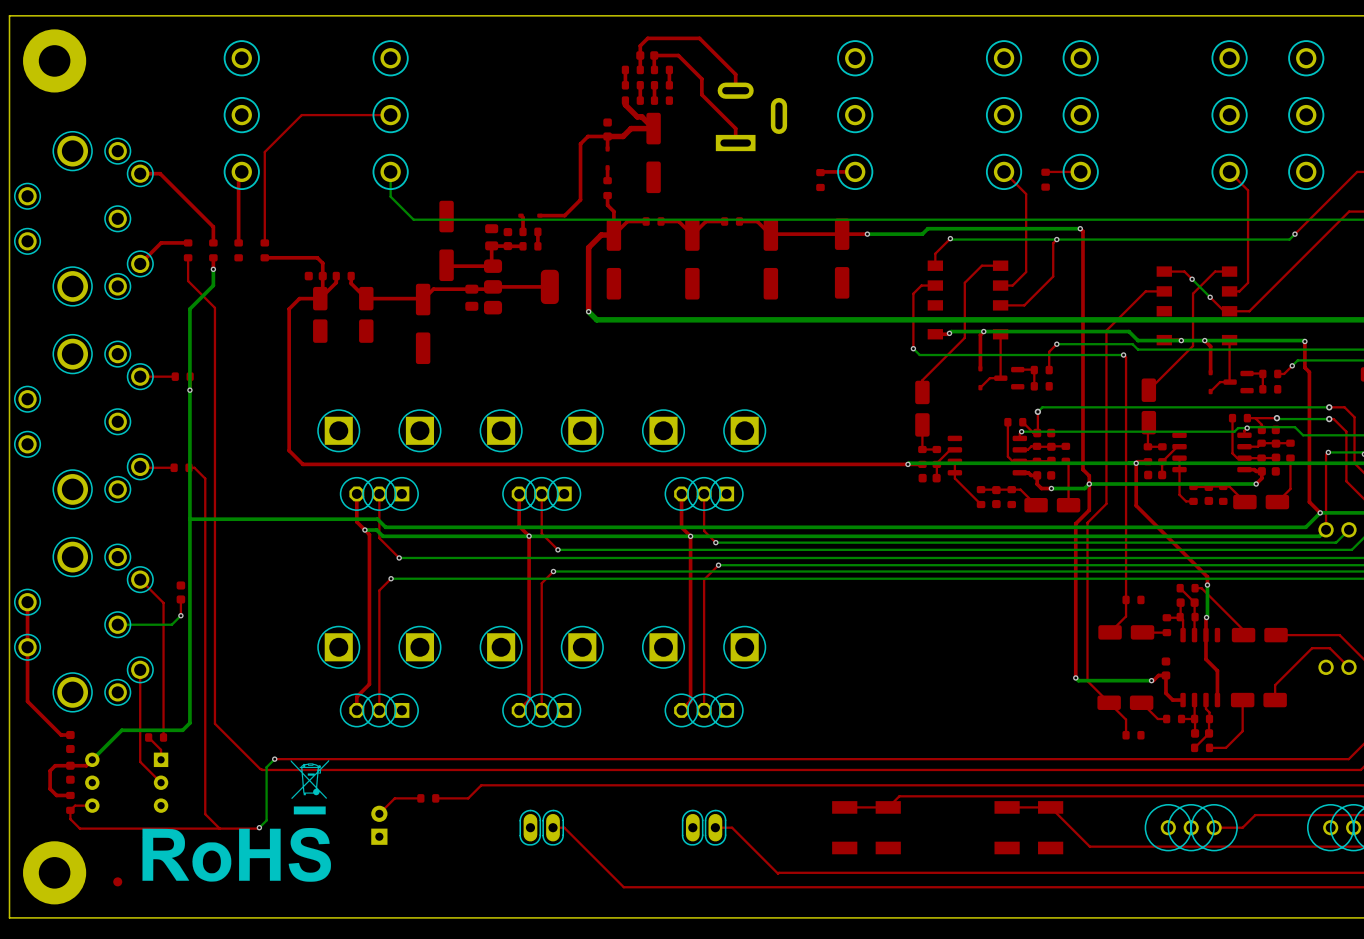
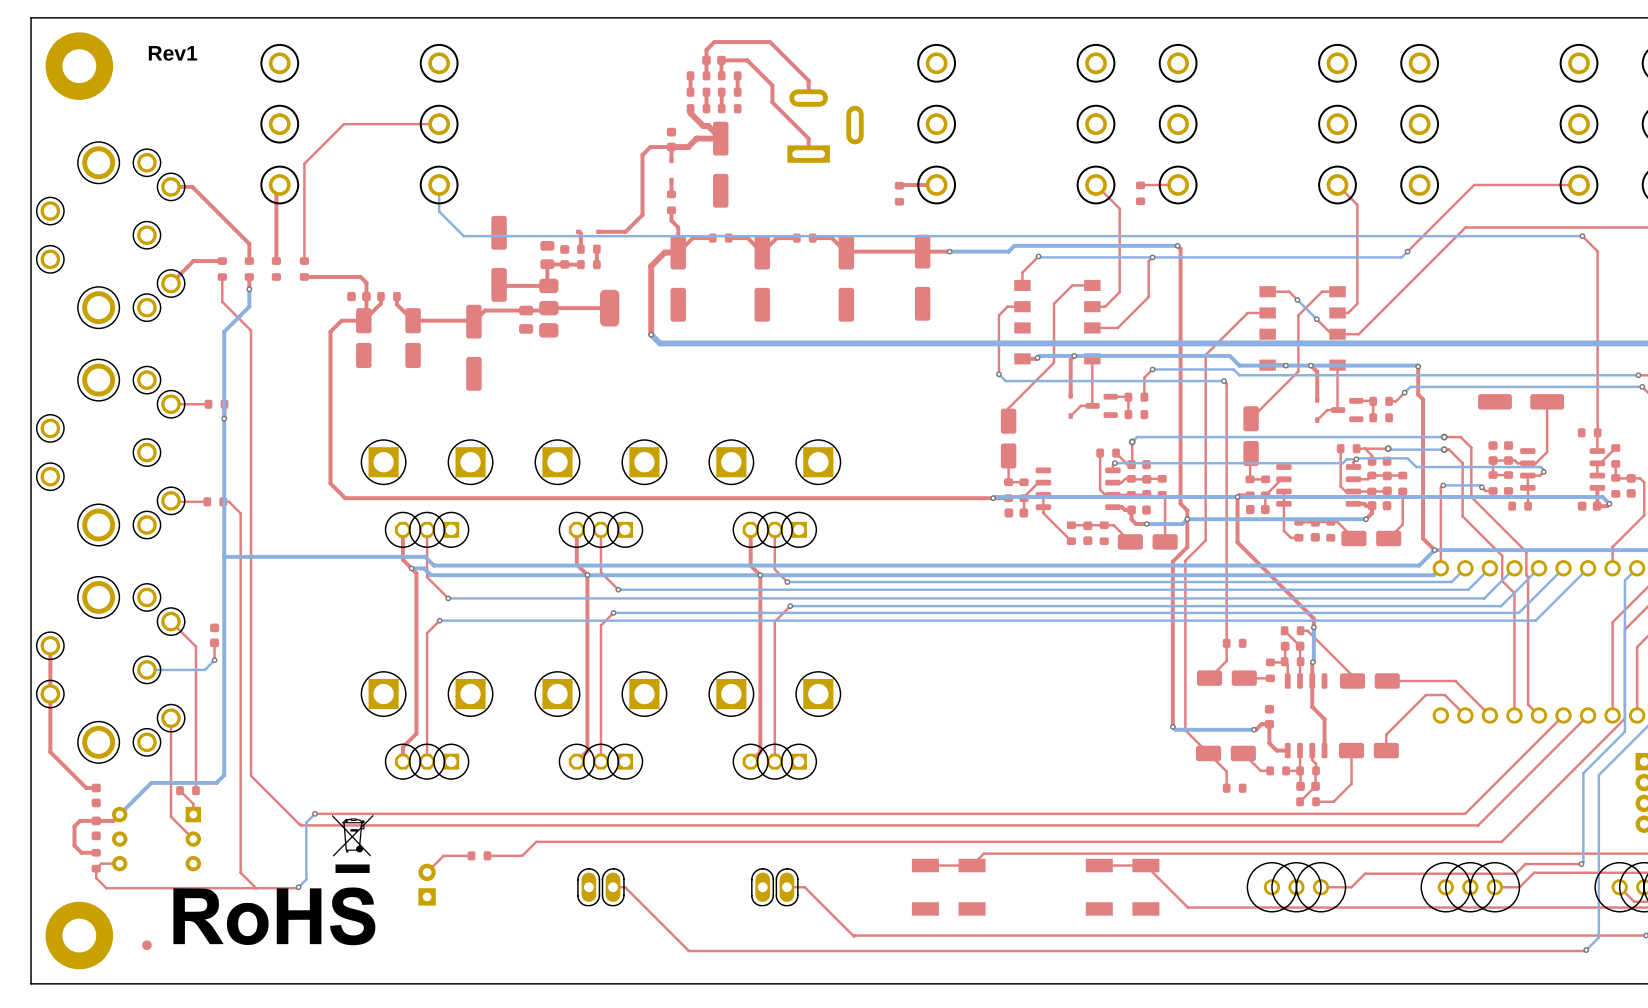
text: none -> Rev1 (173, 53)

